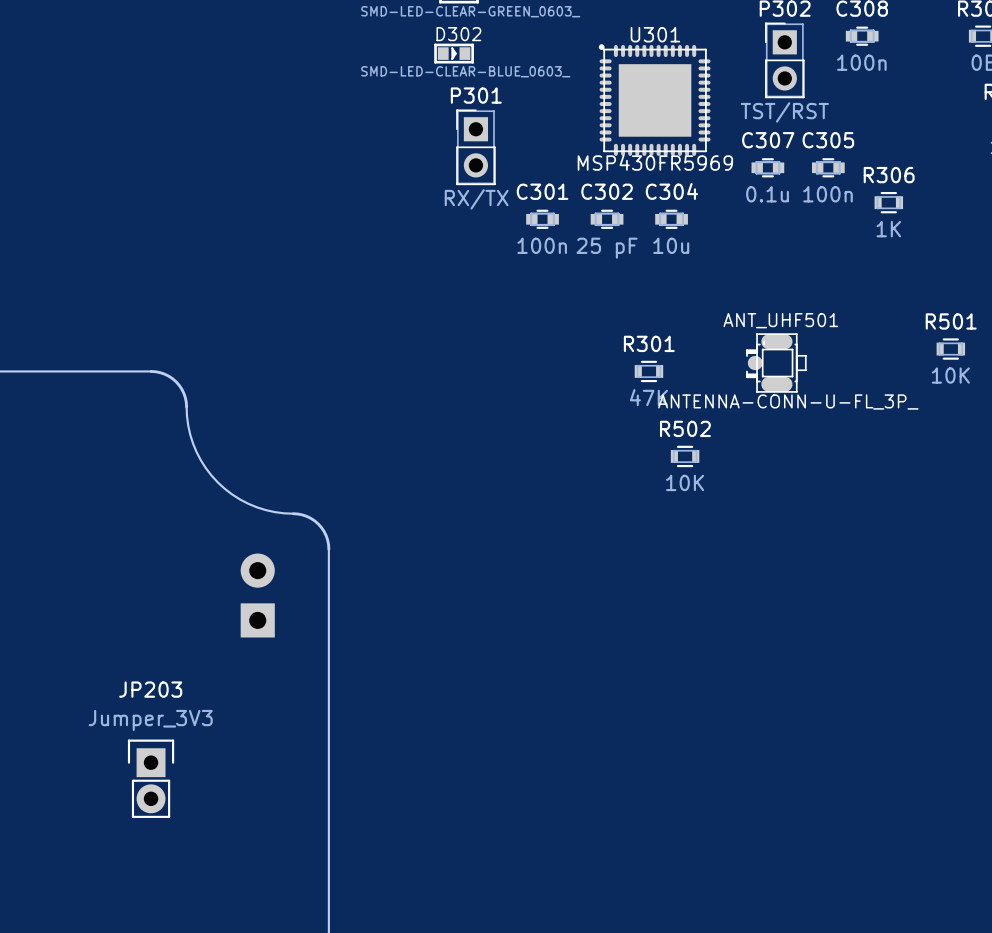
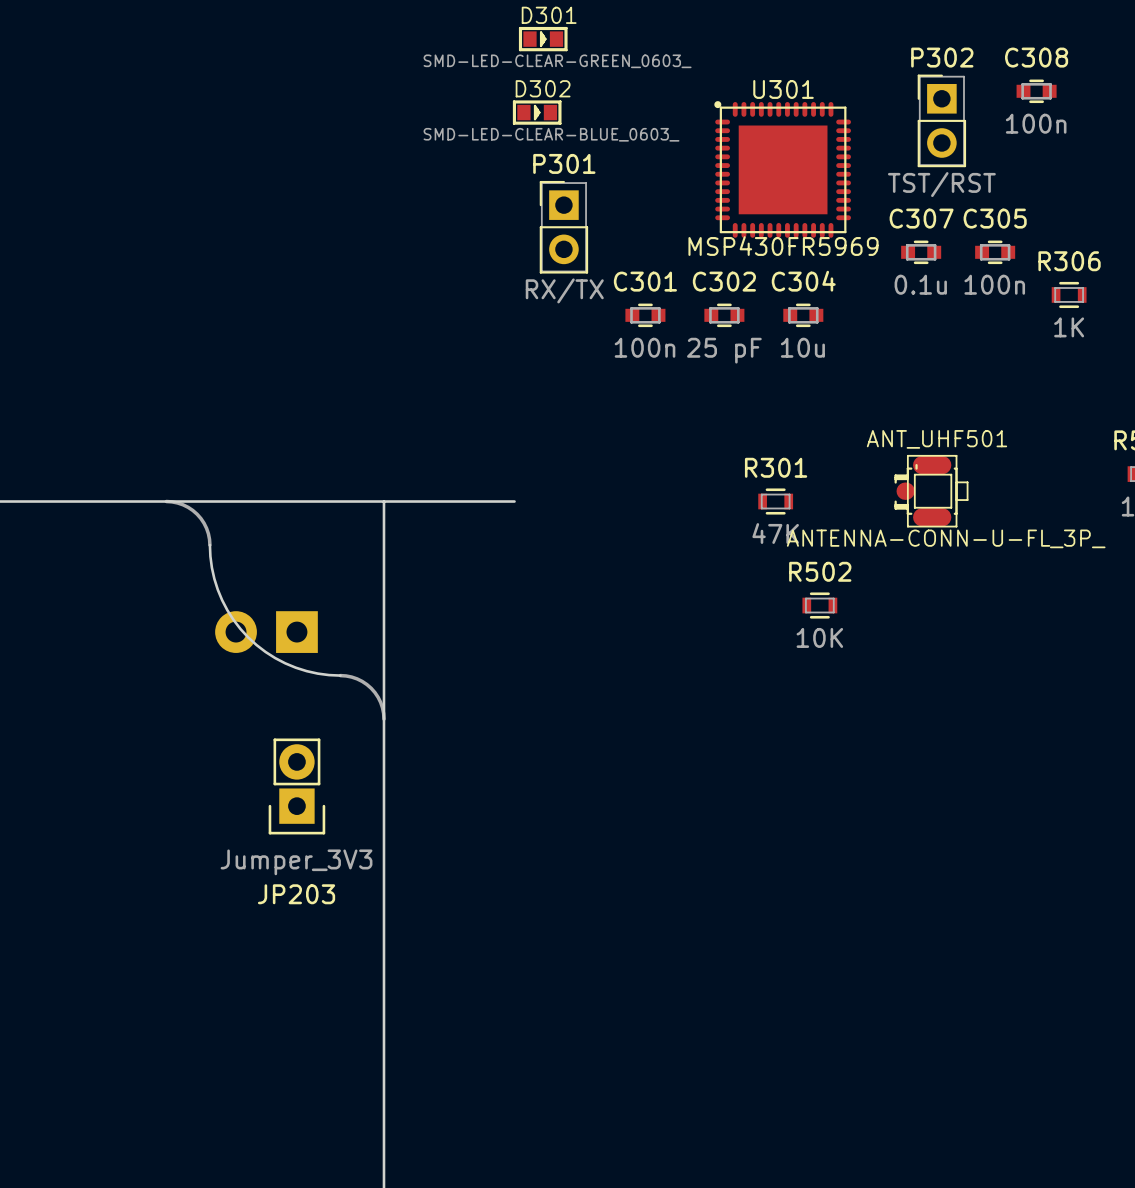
board edge: (151, 371) (164, 374) (176, 381) (183, 393) (186, 407) -> (166, 501) (514, 501)
line: none -> (166, 501) (183, 504) (197, 514) (206, 528) (209, 545)
board edge: (293, 513) (306, 516) (318, 524) (326, 535) (328, 549) -> (383, 501) (383, 719)
line: none -> (340, 675) (357, 678) (371, 688) (380, 702) (383, 719)
part rotation: 0° (257, 595) -> 90° counterclockwise (266, 632)
part position: (257, 595) -> (266, 632)
JP203 rotation: 0° (151, 778) -> 180° (296, 786)
JP203 position: (151, 778) -> (296, 786)

